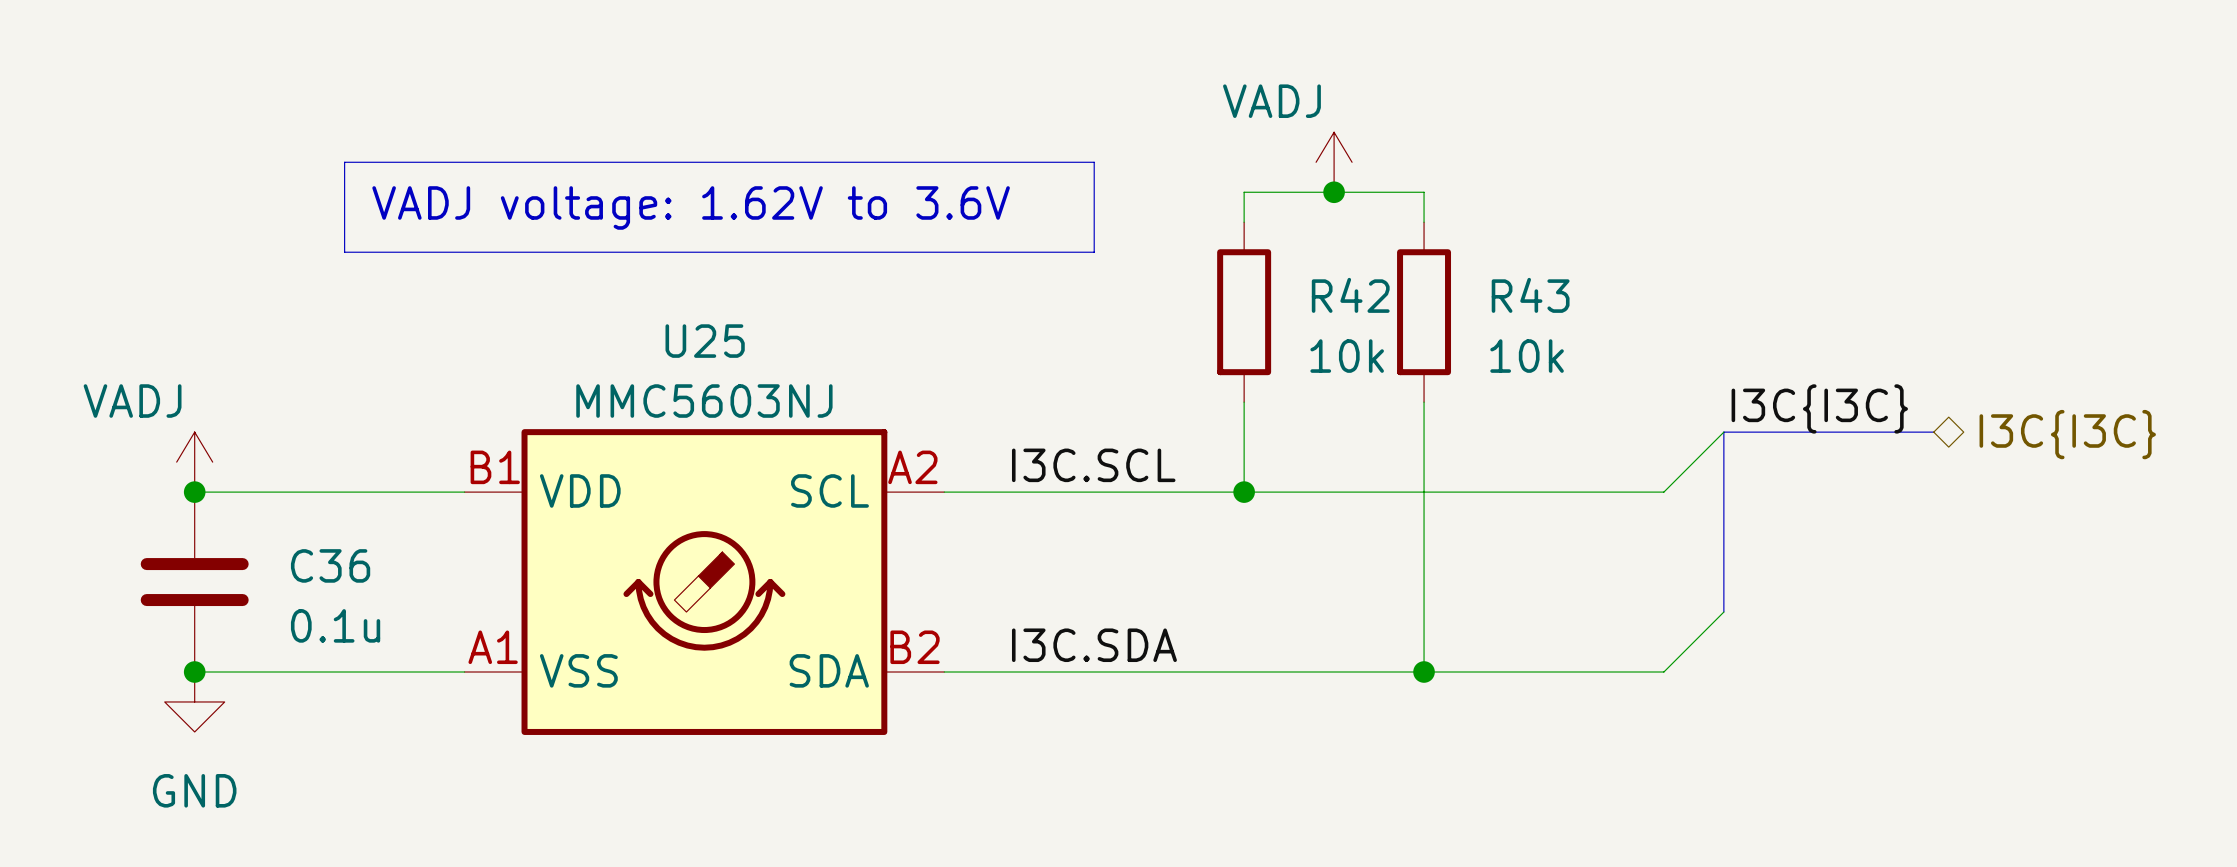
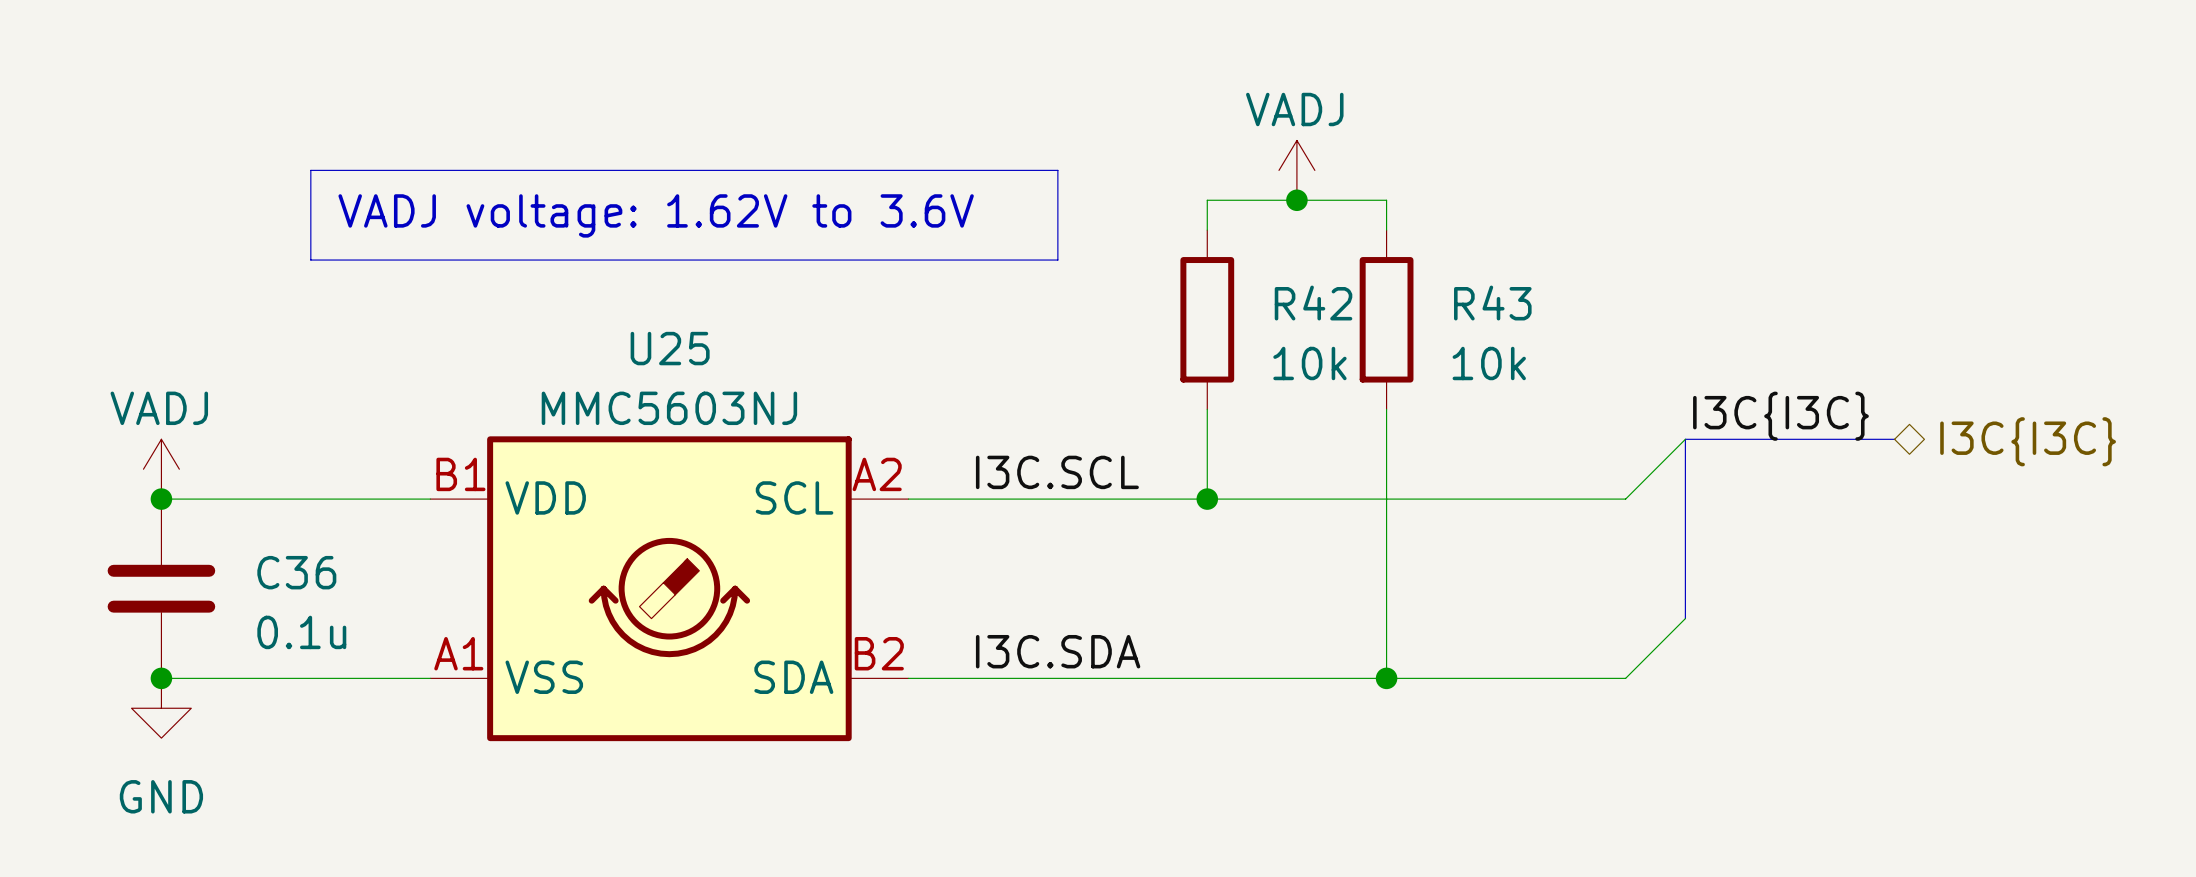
power symbol text position: VADJ (1271, 101) -> VADJ (1294, 109)
power symbol text position: VADJ (132, 401) -> VADJ (159, 408)

